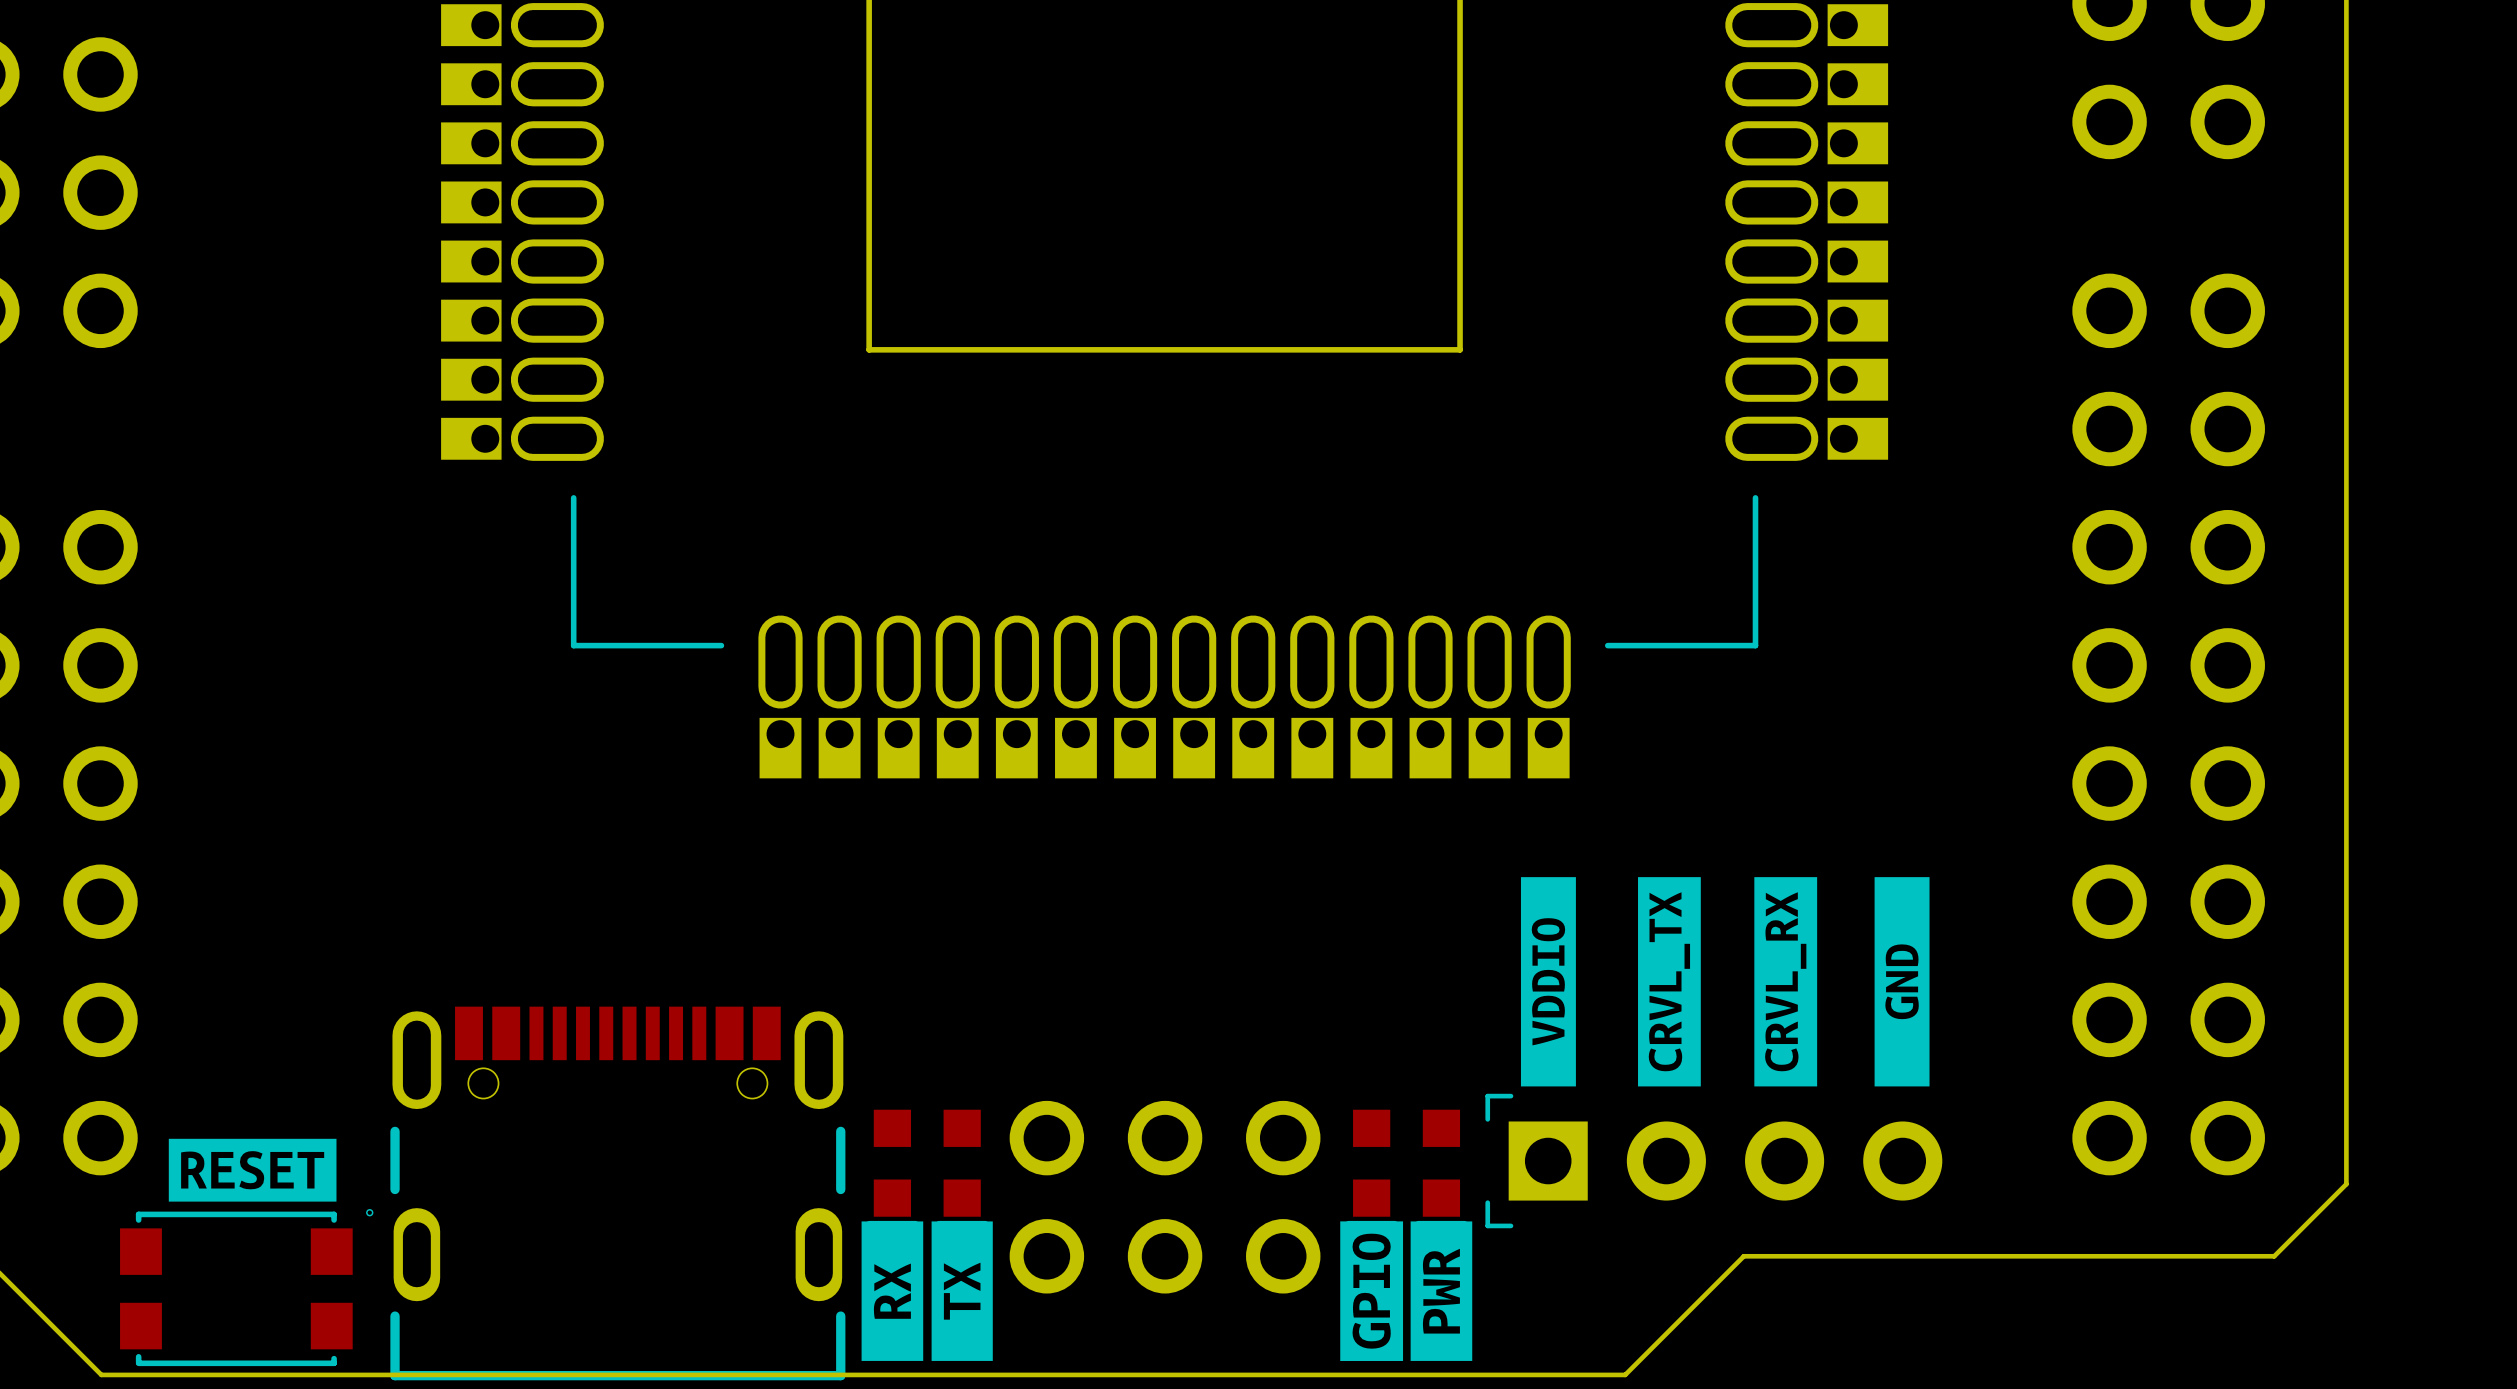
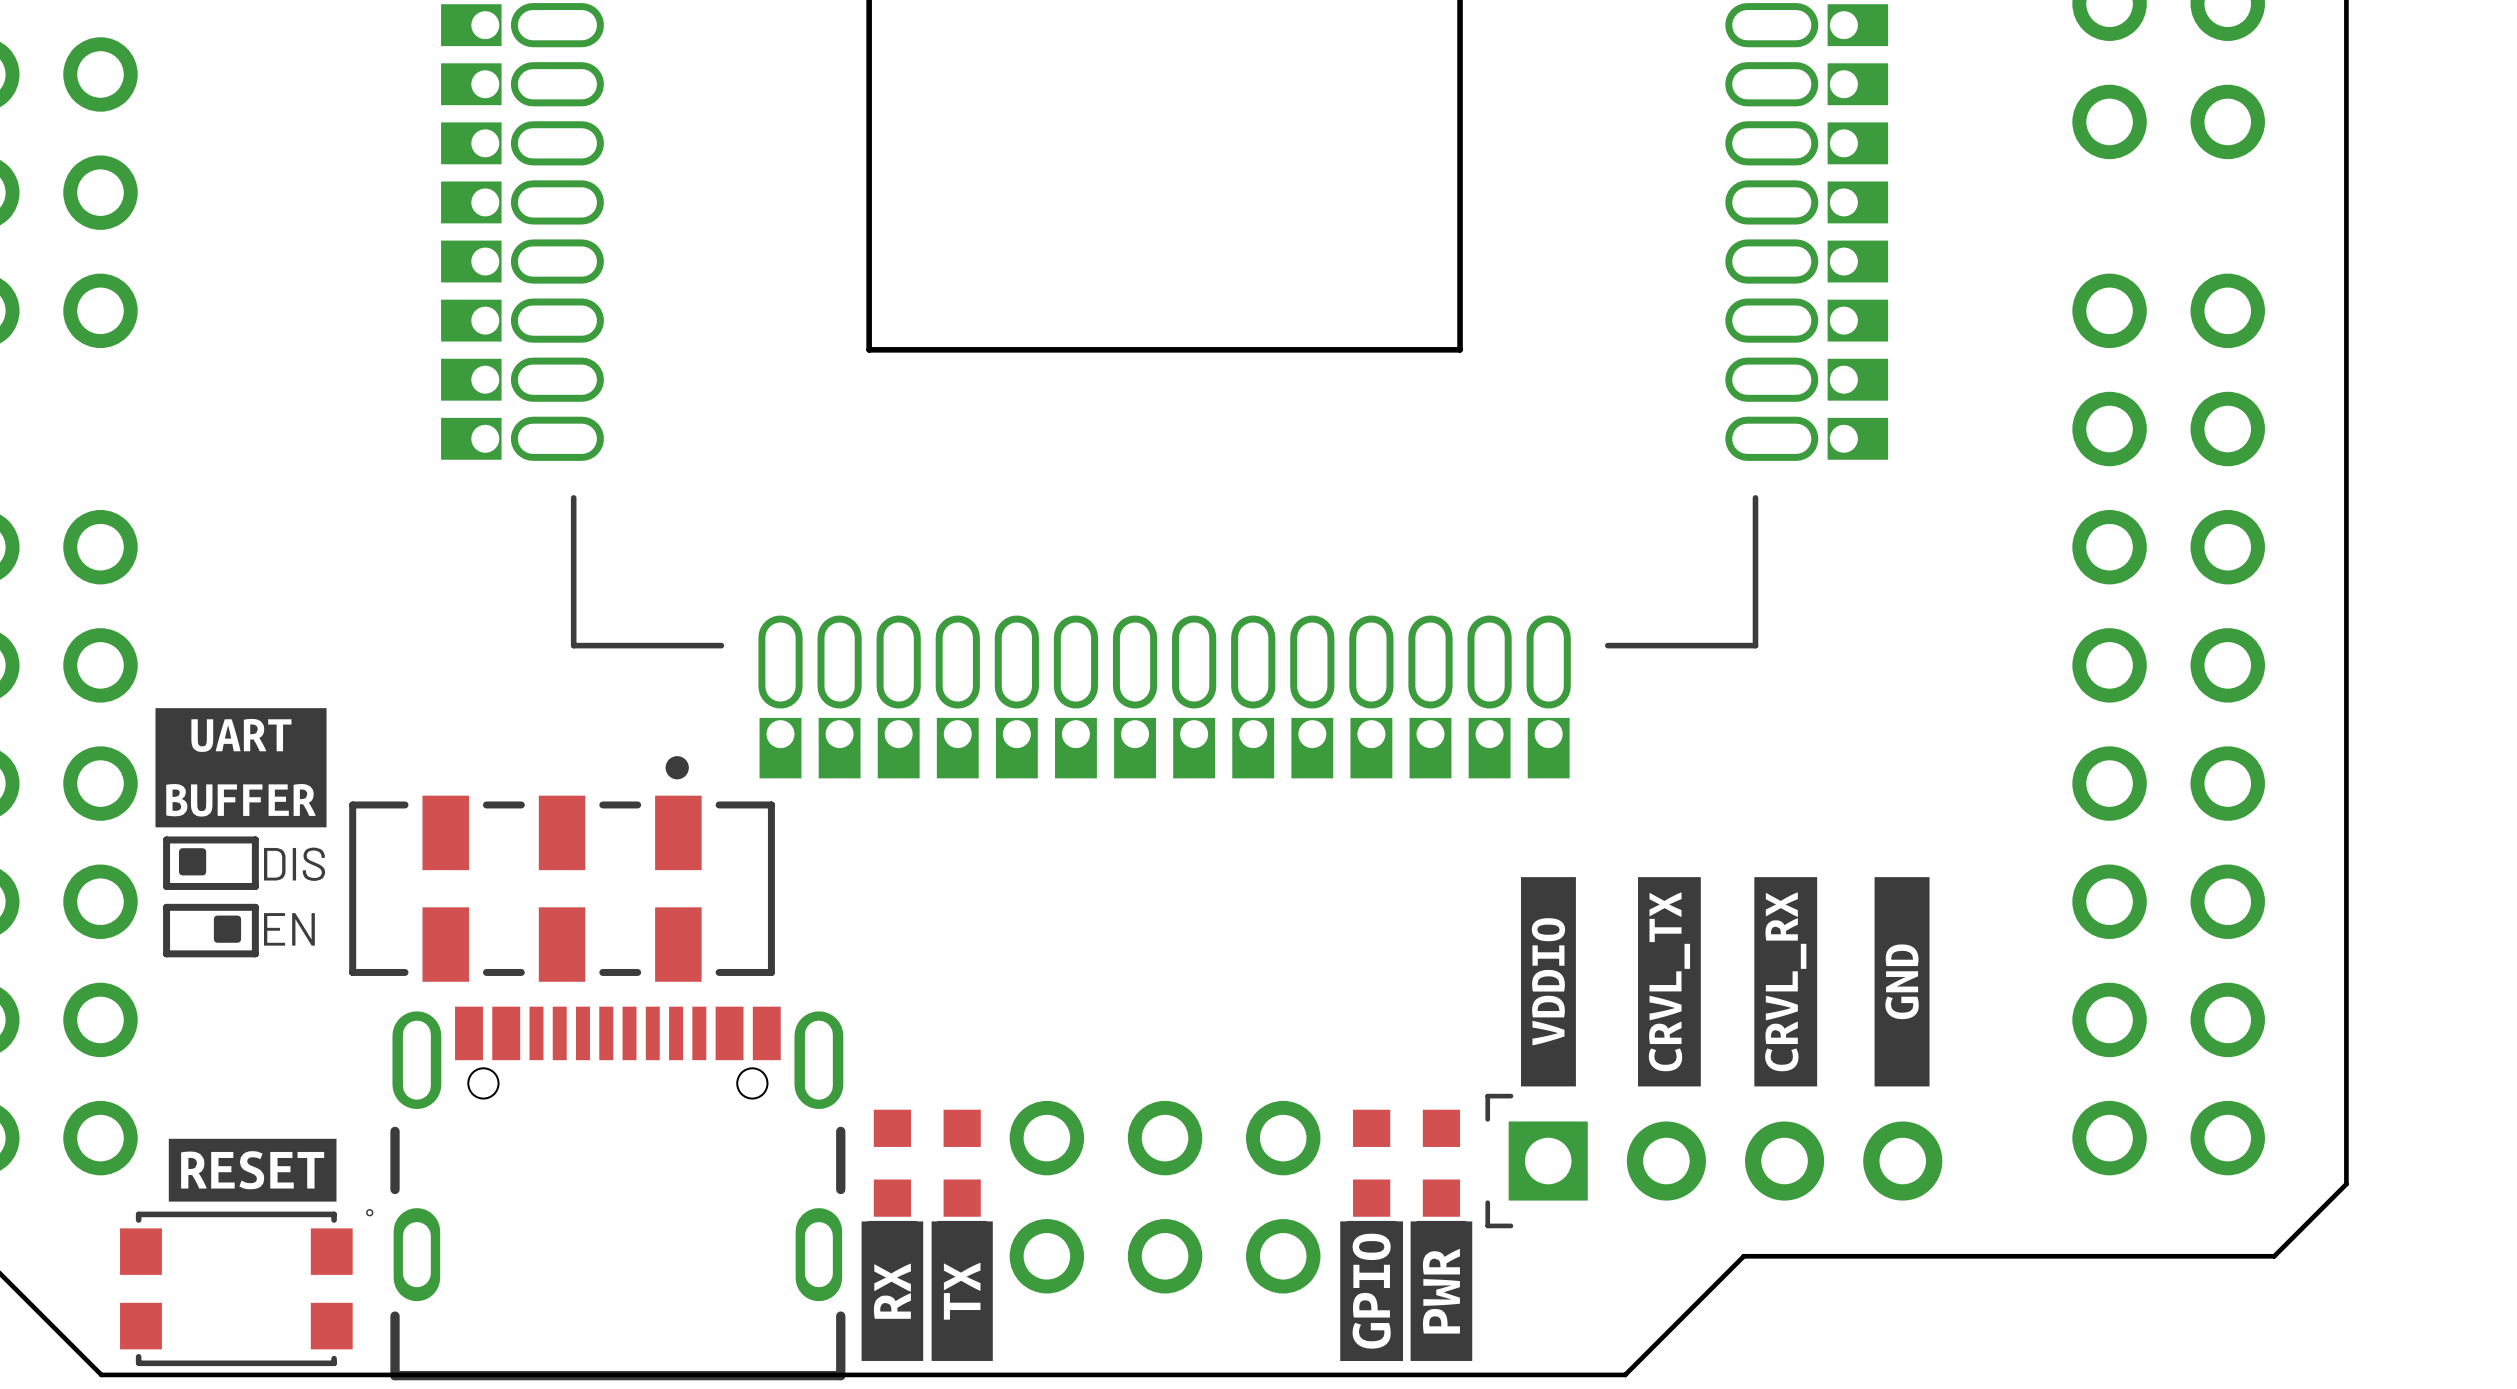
drawing: none -> [155, 708, 327, 943]
line: none -> (166, 839) (166, 886) (255, 886) (255, 839) (166, 839)
text: none -> DIS (294, 864)
part: none -> (562, 868)
line: none -> (166, 907) (255, 907) (255, 953) (166, 953) (166, 907)
text: none -> EN (289, 929)

